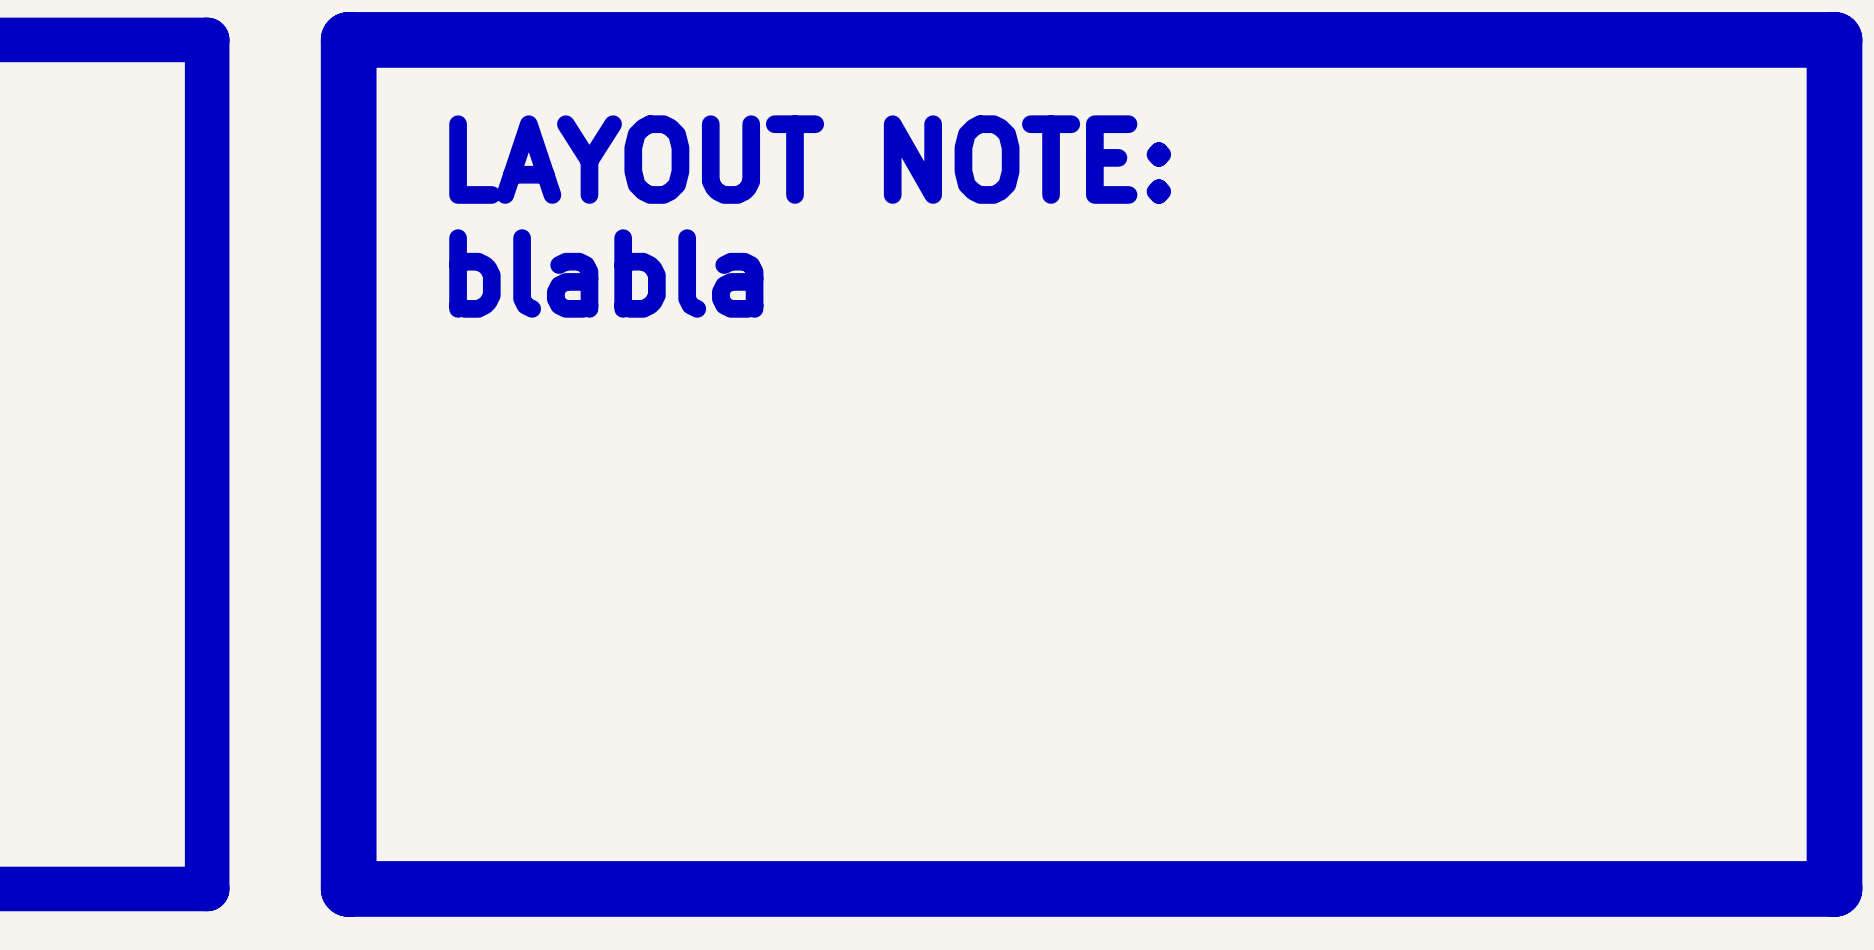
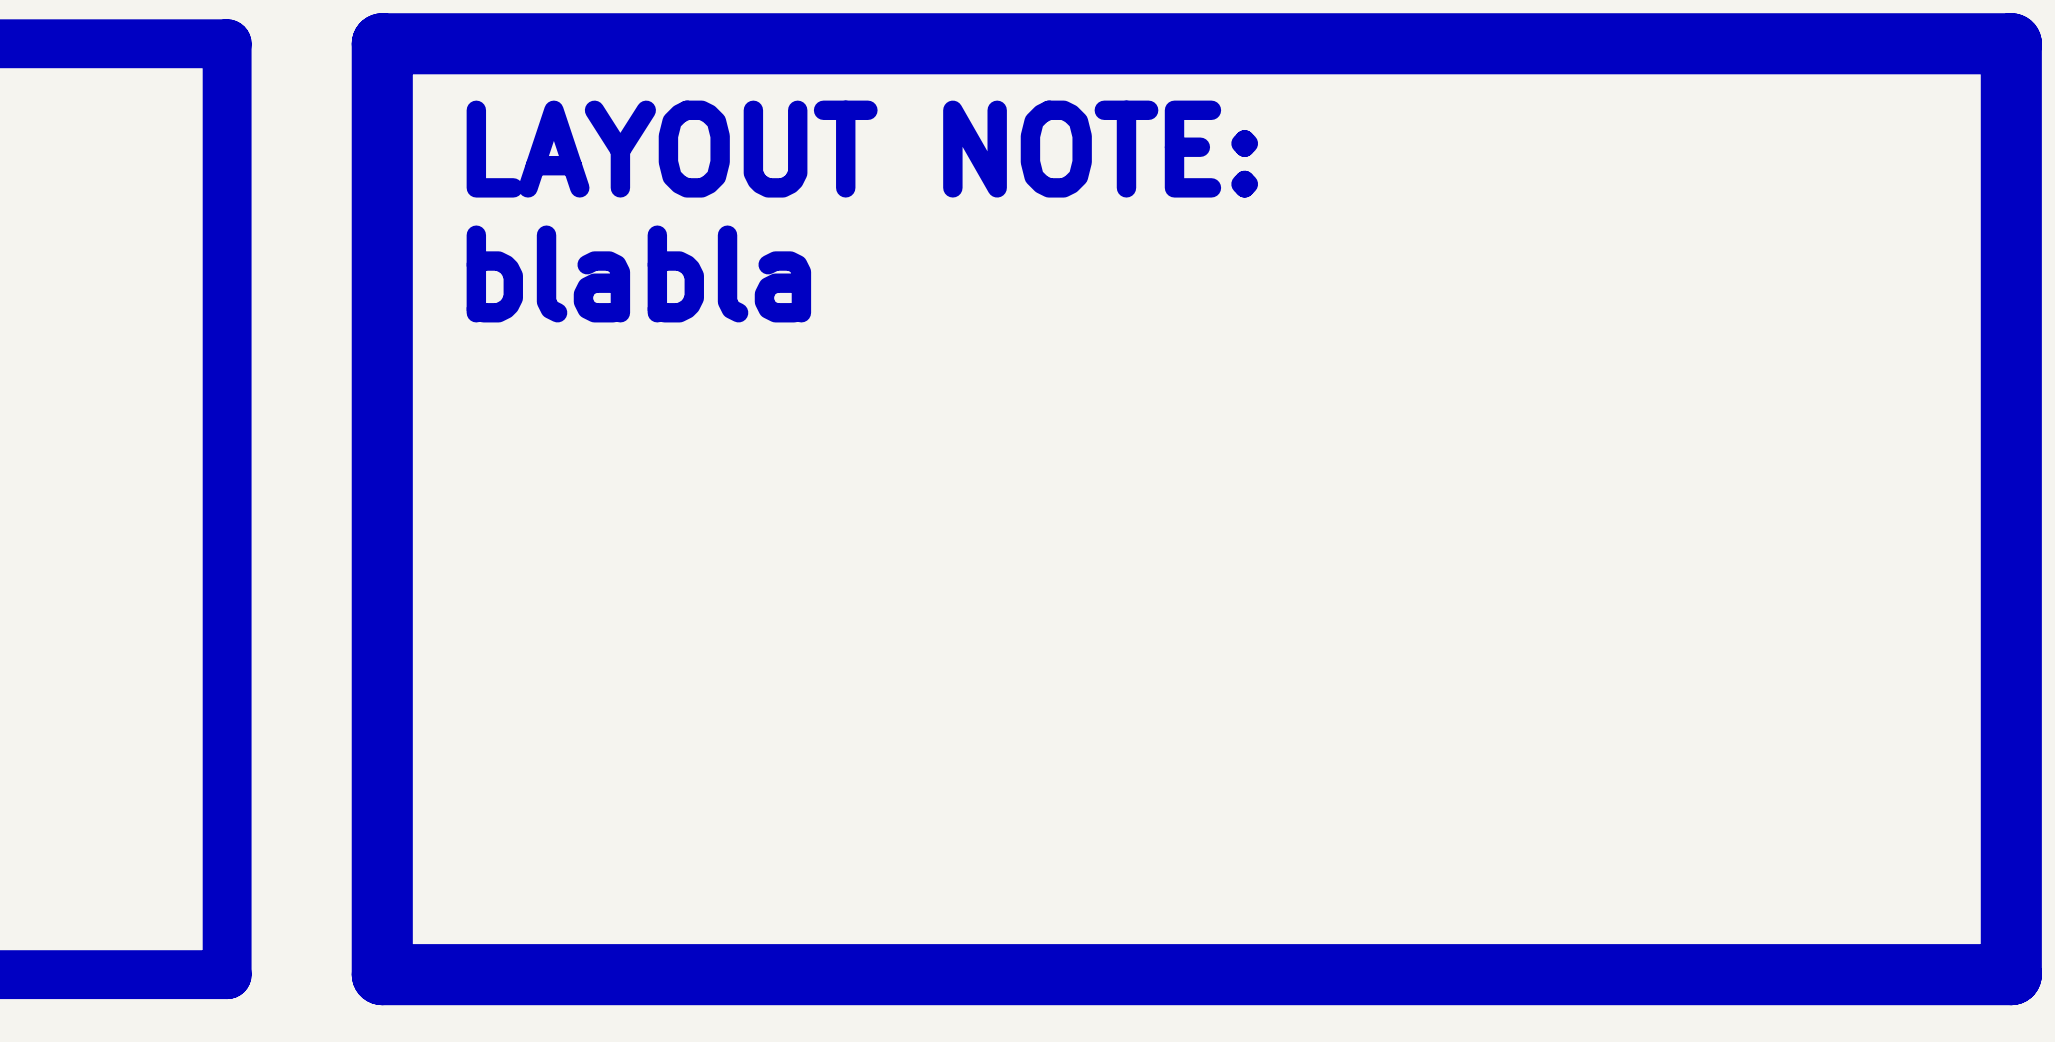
text position: LAYOUT NOTE: (810, 159) -> LAYOUT NOTE: (862, 149)
text position: blabla (606, 273) -> blabla (638, 273)

